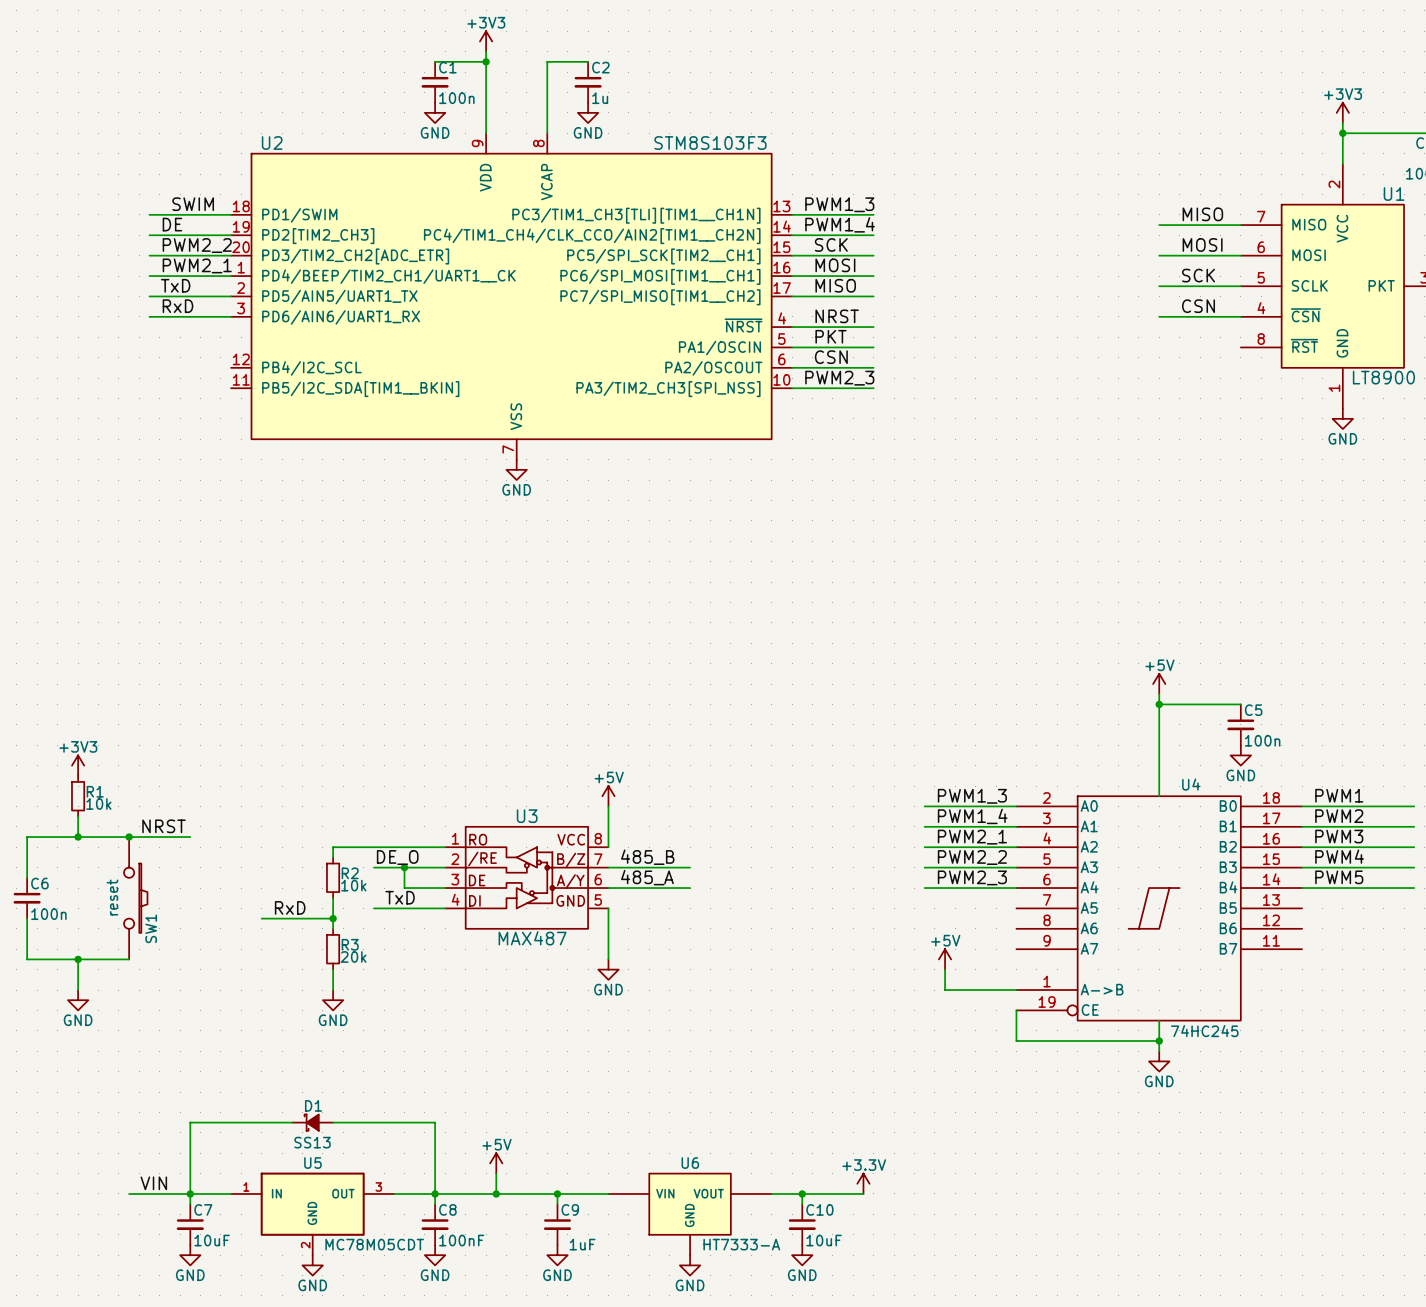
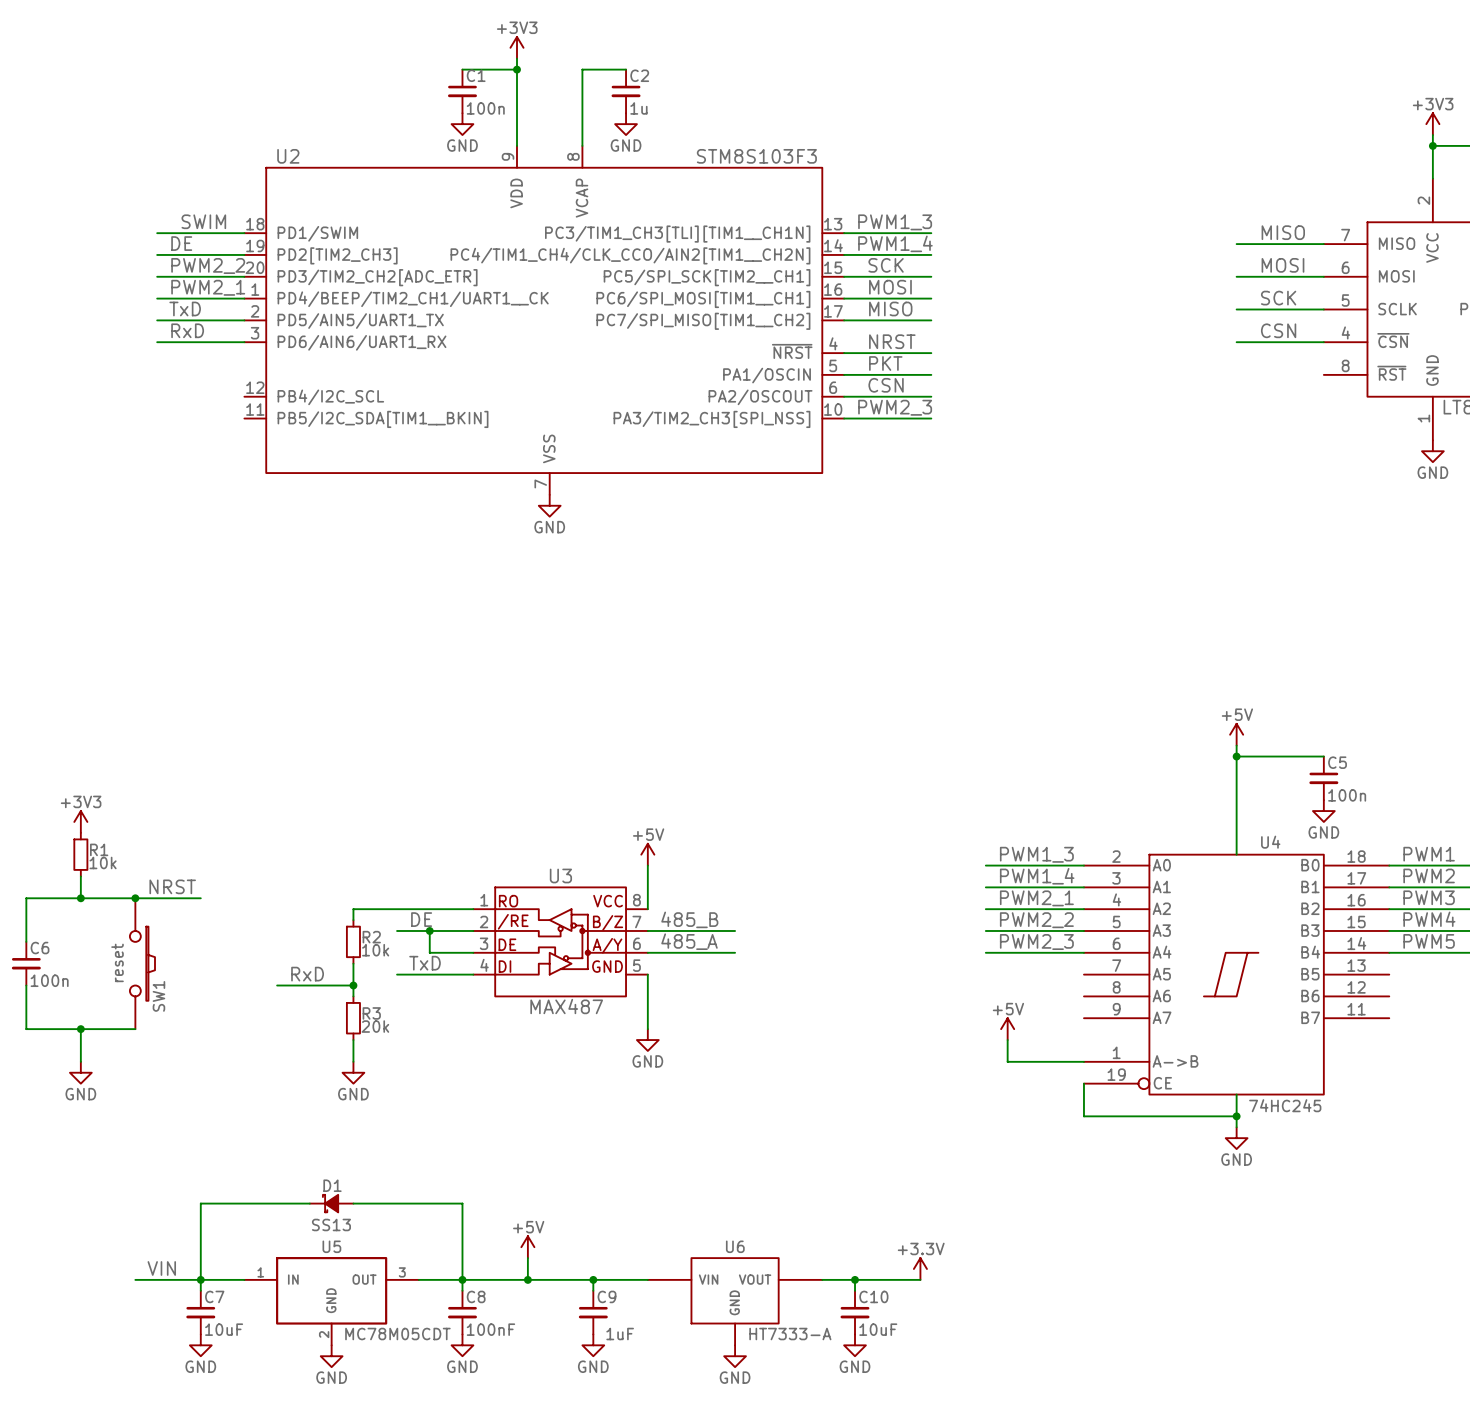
label: DE_O (397, 857) -> DE (421, 919)

